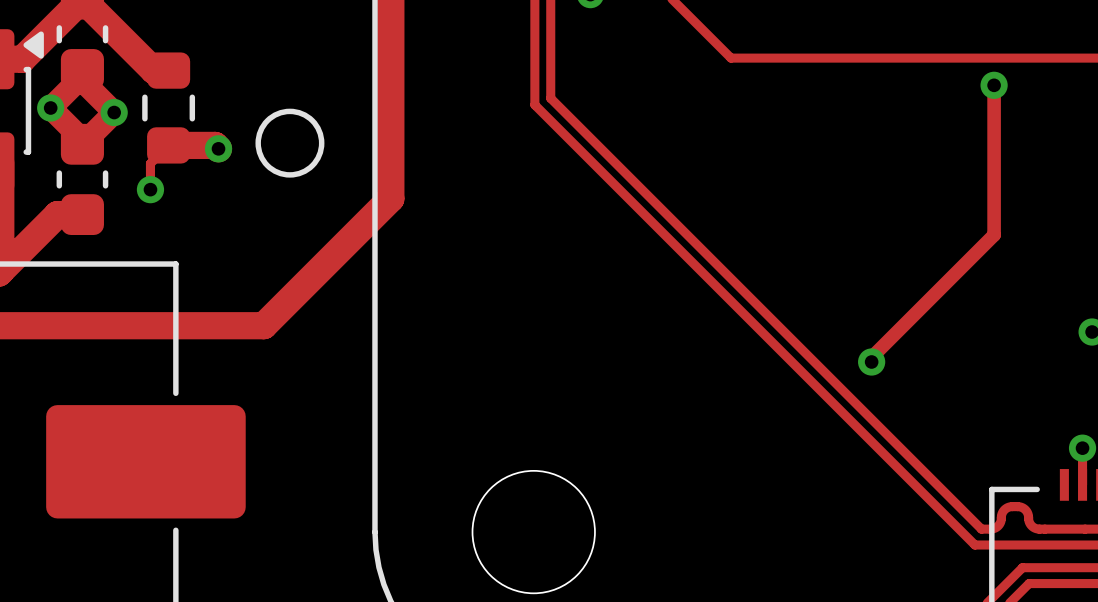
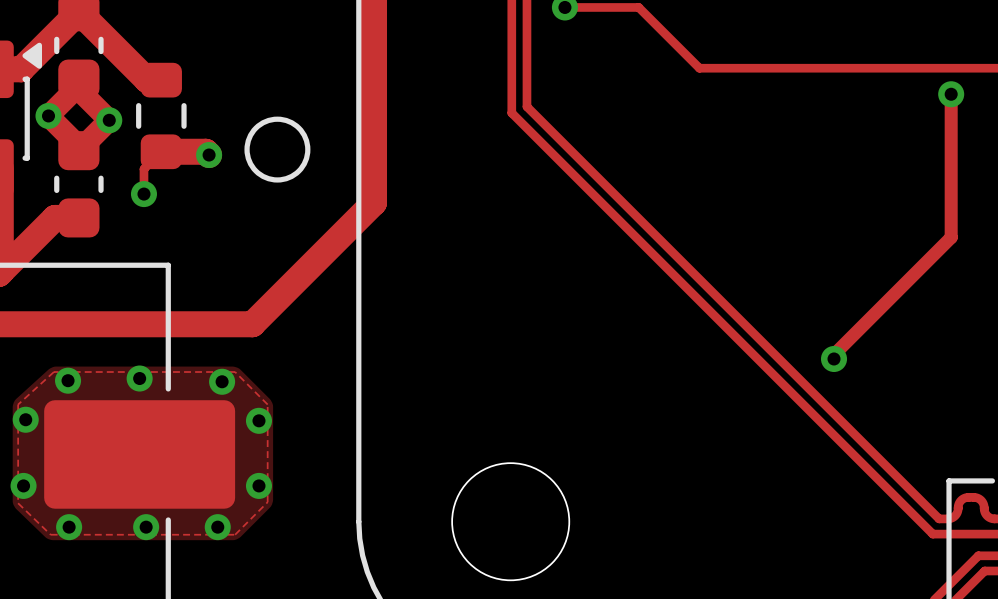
zone outline: none -> (53, 372) (18, 404) (18, 503) (50, 534) (235, 534) (267, 502) (267, 404) (235, 372) (53, 372)
via: none -> (139, 378)
via: none -> (68, 380)
via: none -> (222, 381)
via: none -> (25, 419)
via: none -> (258, 420)
via: none -> (23, 485)
via: none -> (258, 485)
via: none -> (69, 527)
via: none -> (146, 527)
via: none -> (217, 527)

